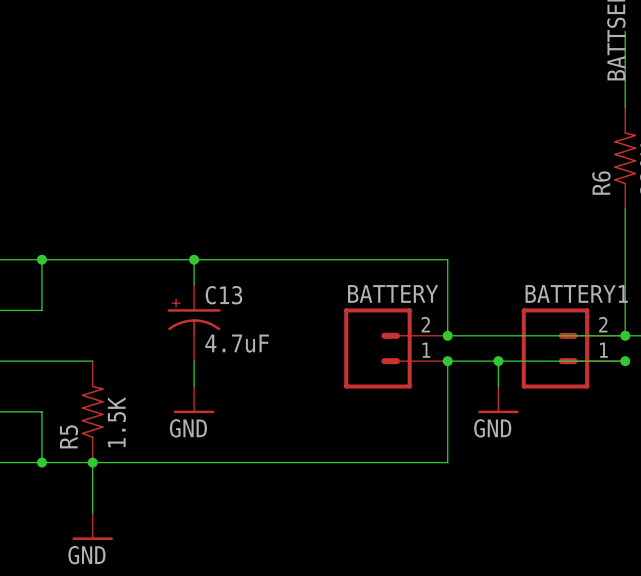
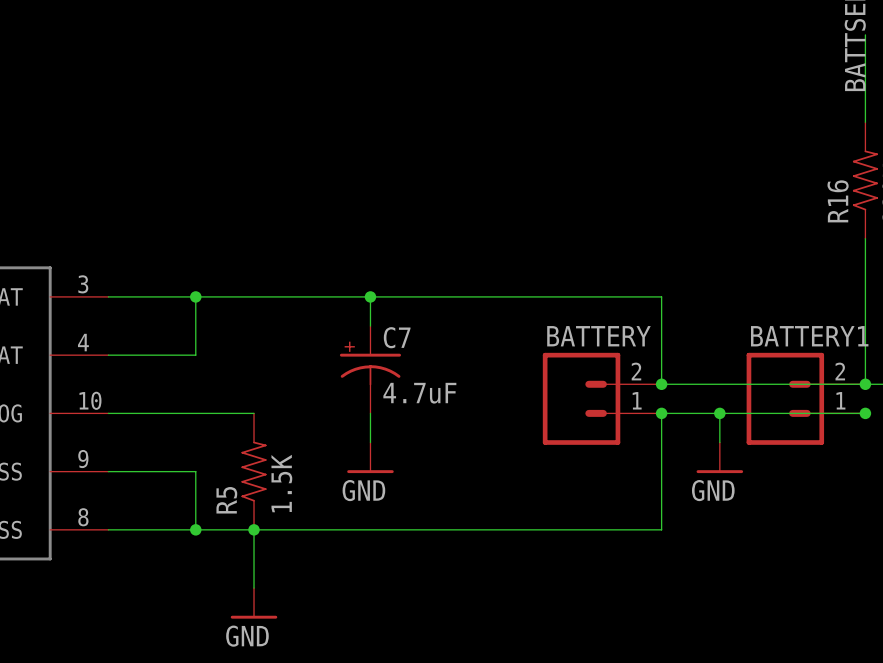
R6 name: R6 (601, 183) -> R16 (838, 201)
C13 name: C13 (223, 295) -> C7 (397, 337)

